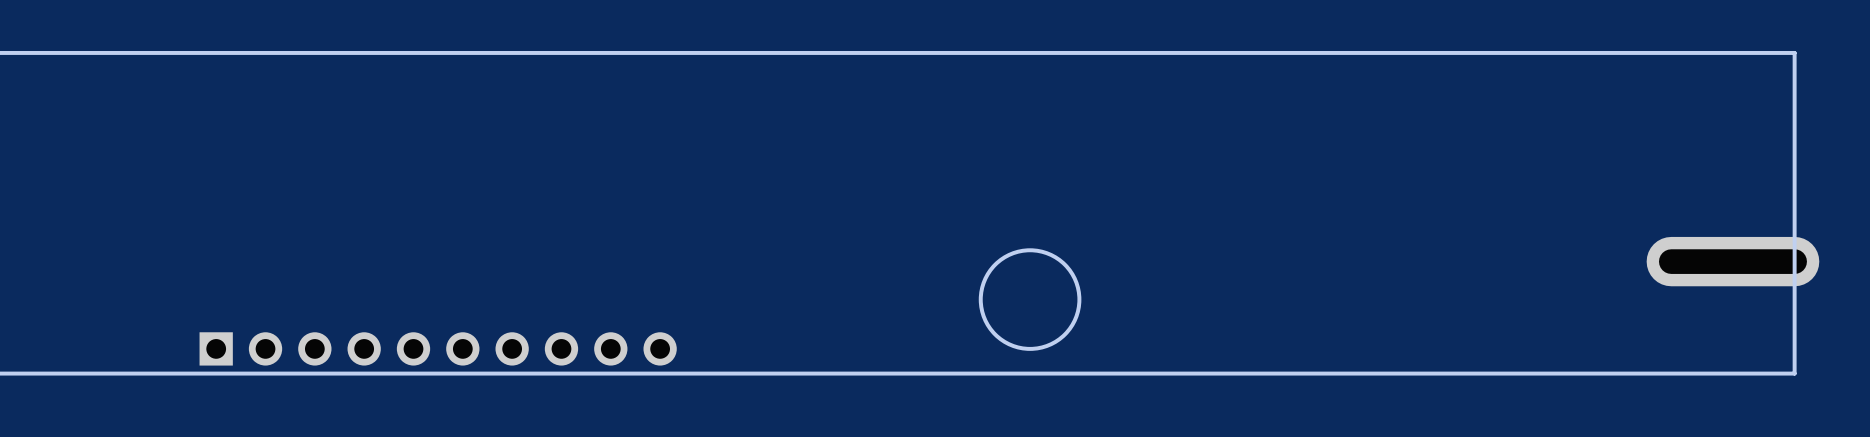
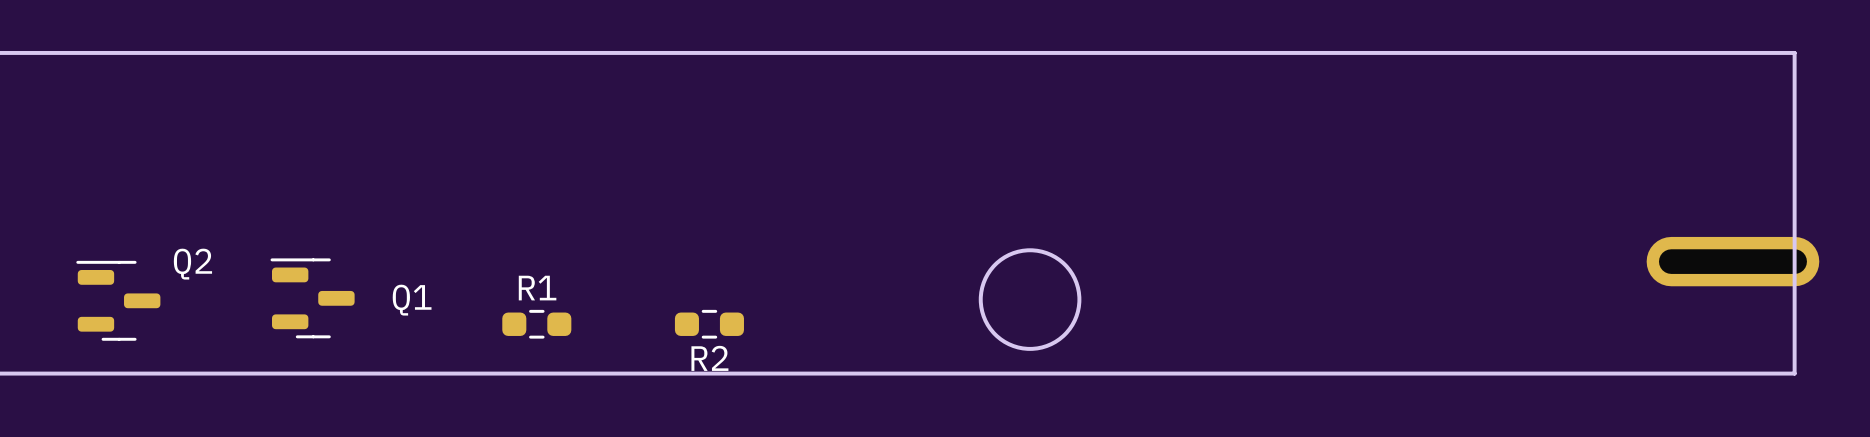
Q1: none -> (312, 298)
Q2: none -> (118, 300)
R1: none -> (536, 324)
R2: none -> (709, 324)
part: (438, 348) -> none

